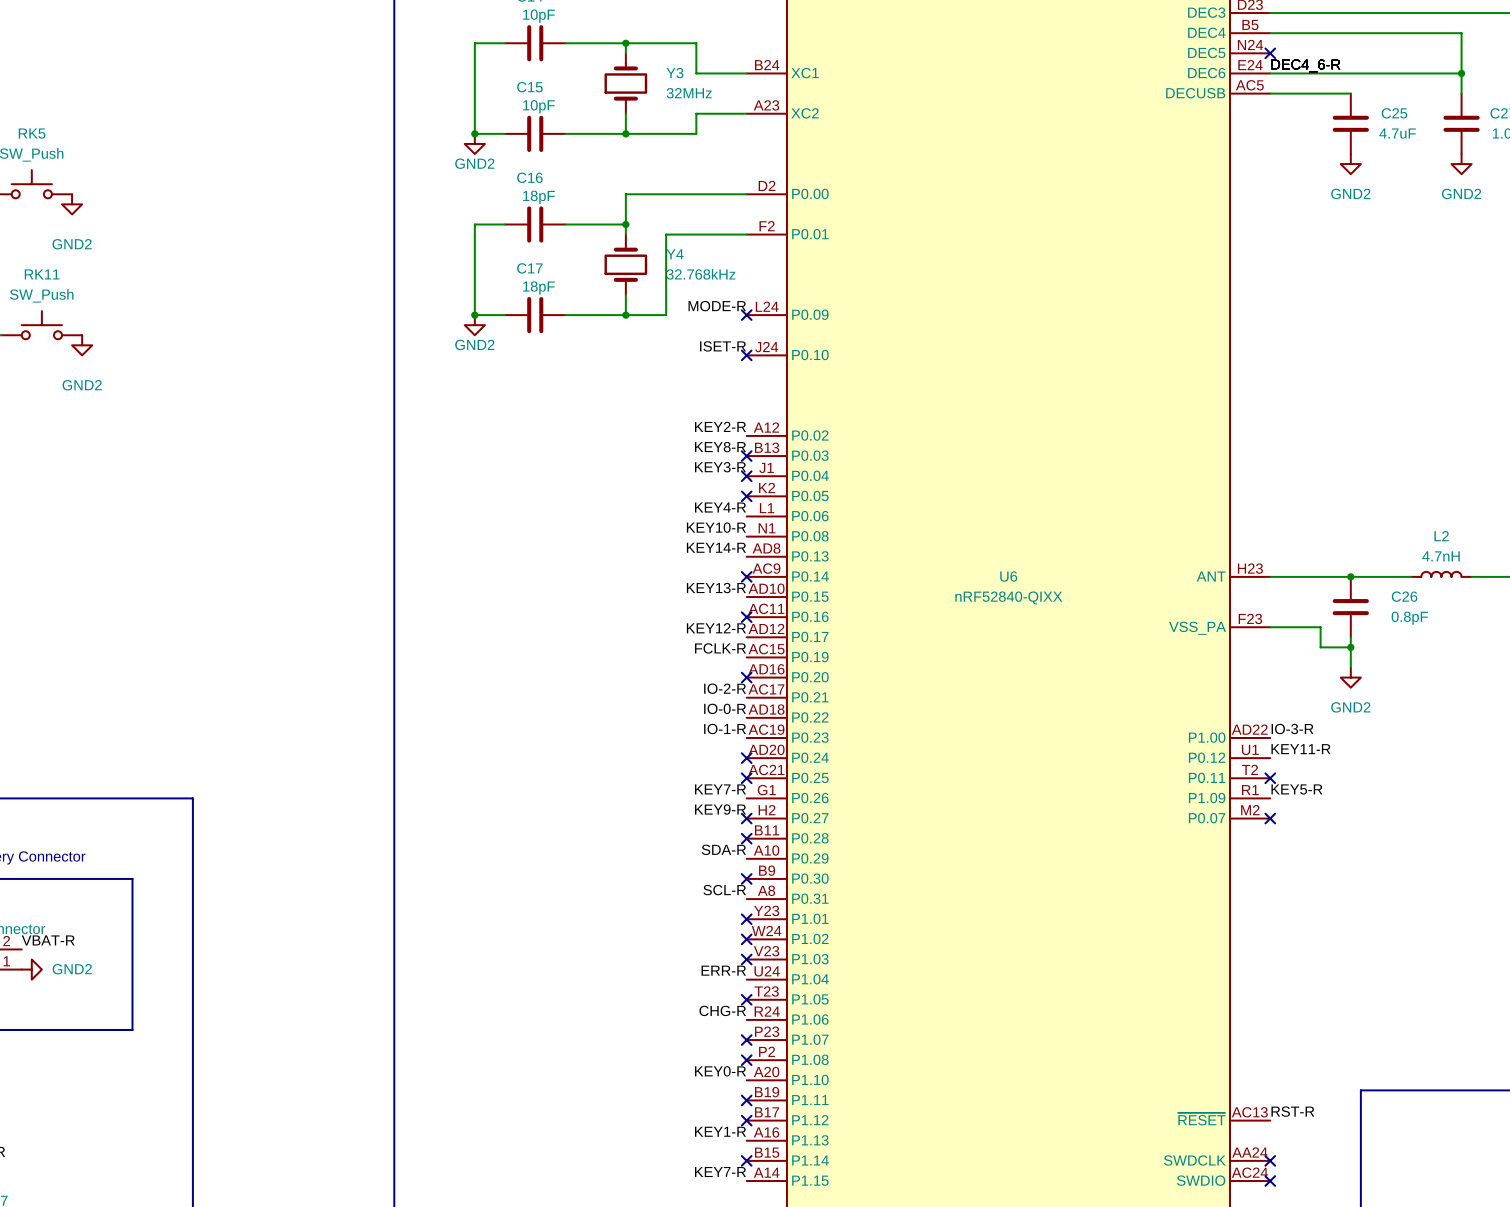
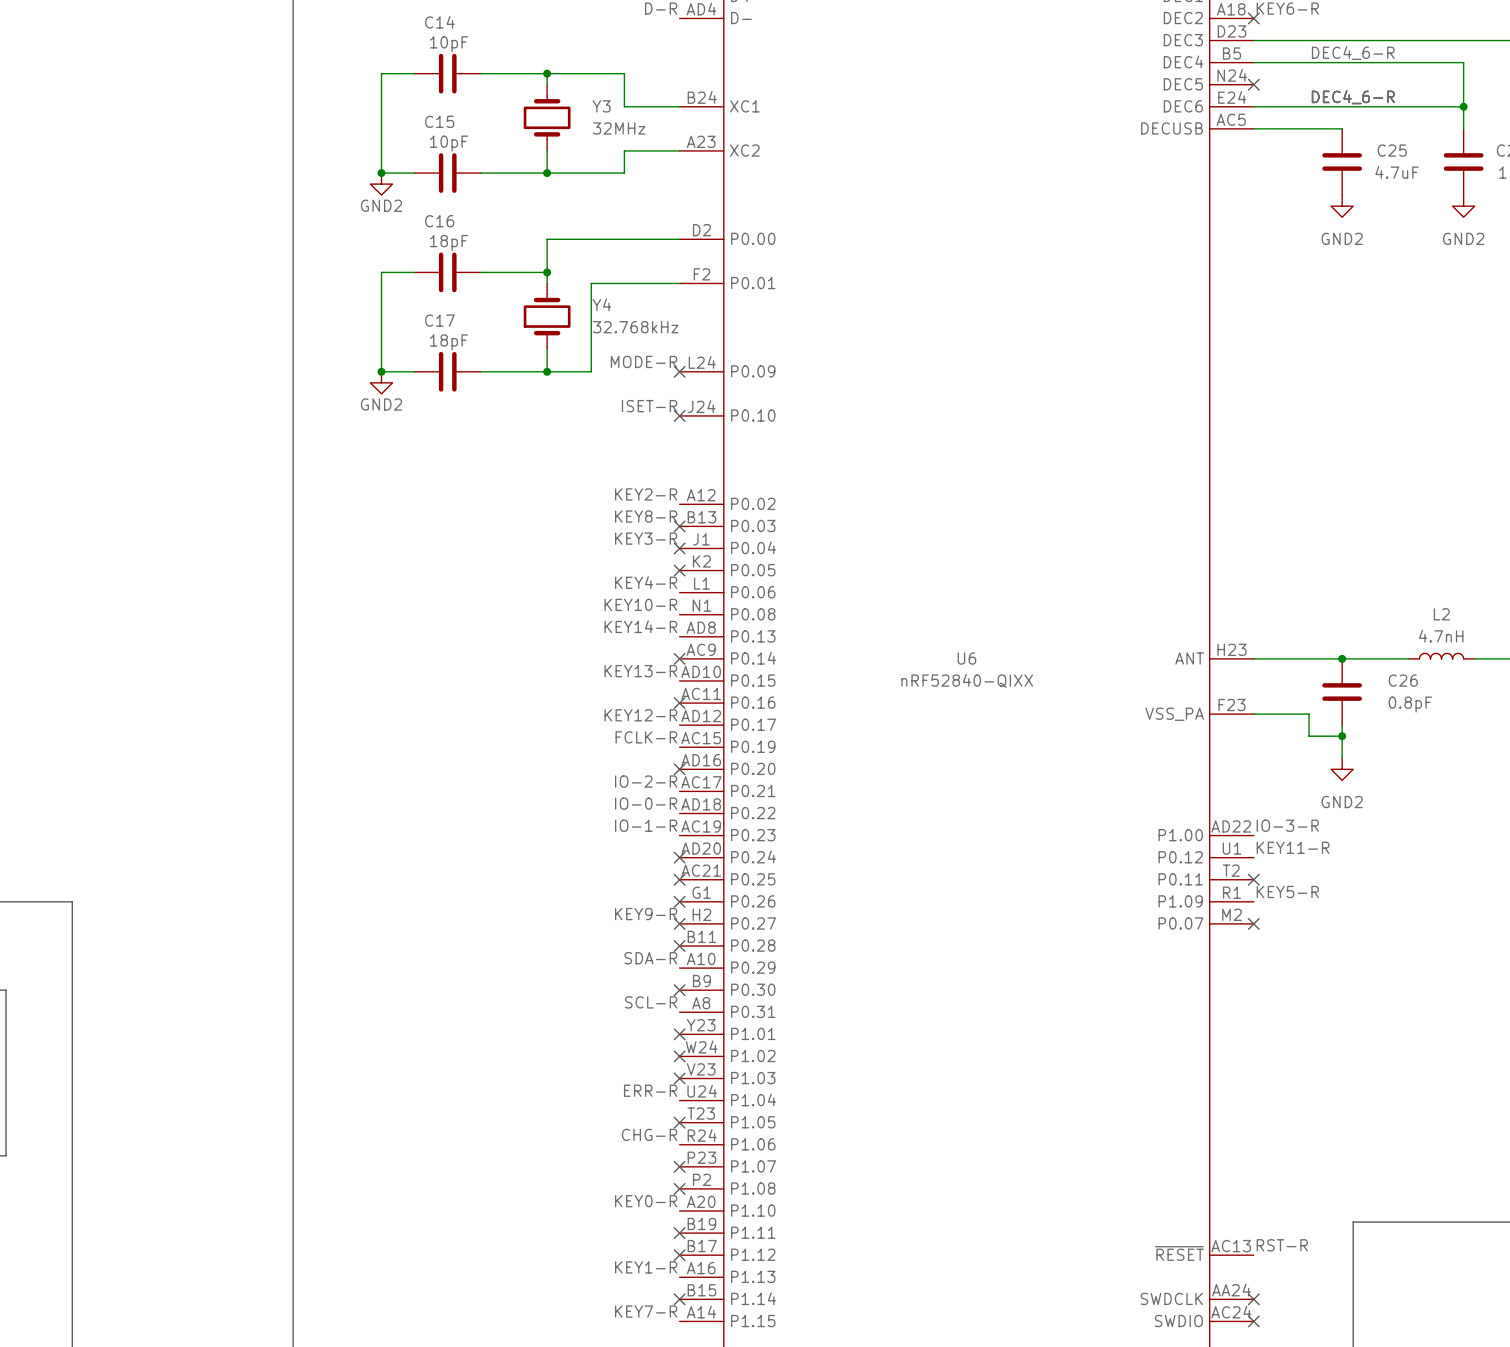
label: none -> DEC4_6-R (1353, 53)
label position: DEC4_6-R (1305, 65) -> DEC4_6-R (1353, 97)
label: KEY7-R (720, 789) -> none
no-connect mark: none -> (679, 901)

